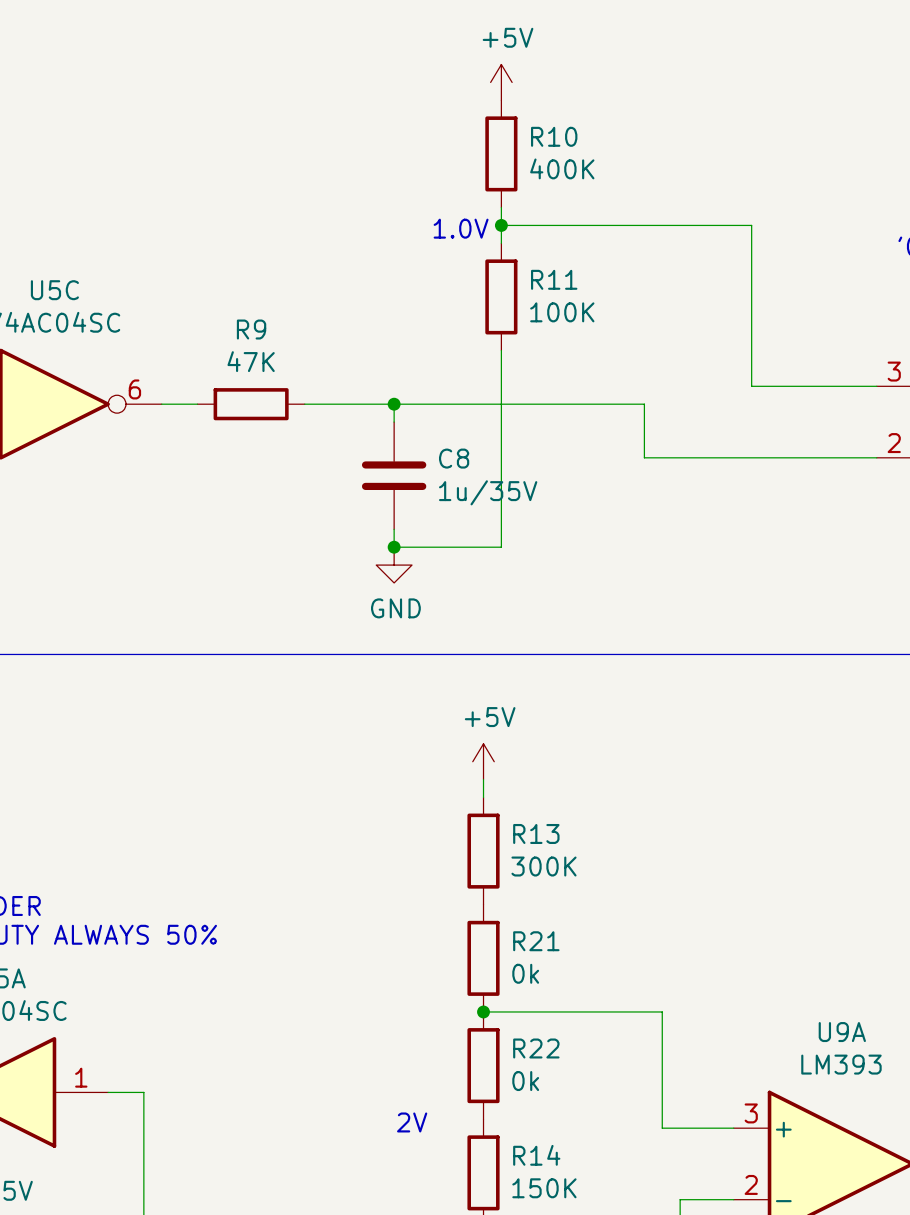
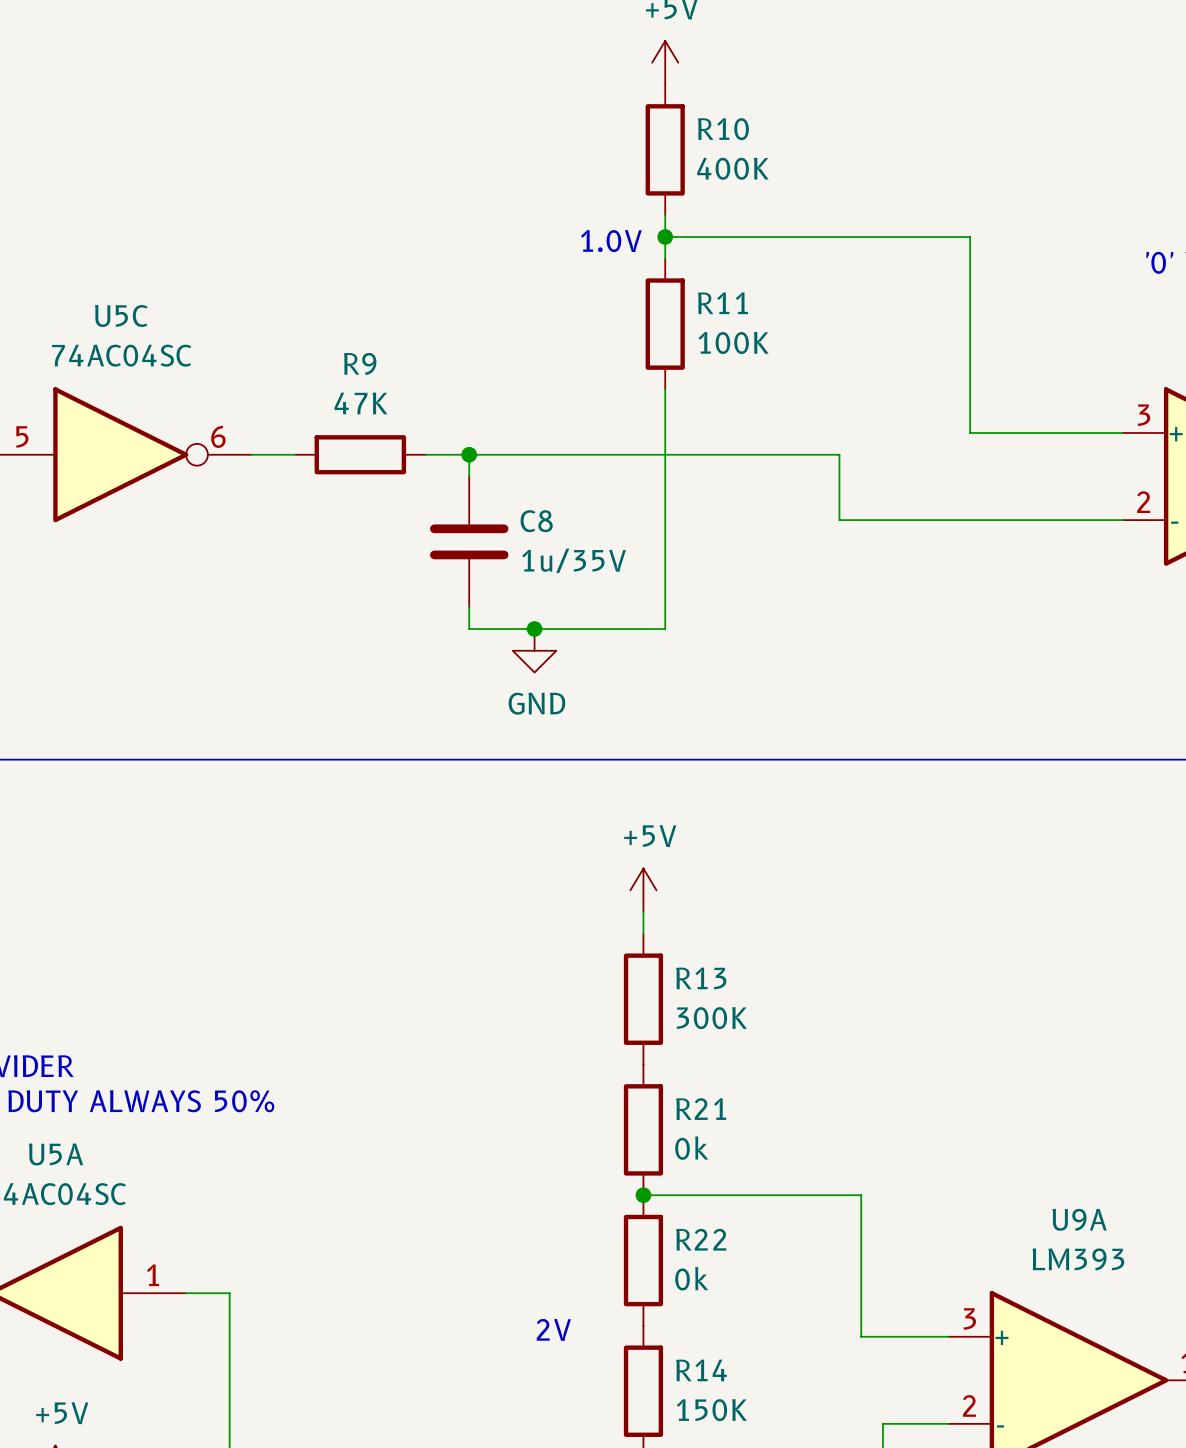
wire: (394, 404) (394, 422) -> (469, 454) (469, 476)
junction position: (394, 404) -> (469, 454)
C8 position: (394, 475) -> (469, 541)
wire: (394, 529) (394, 547) -> (469, 607) (469, 628) (534, 628)

